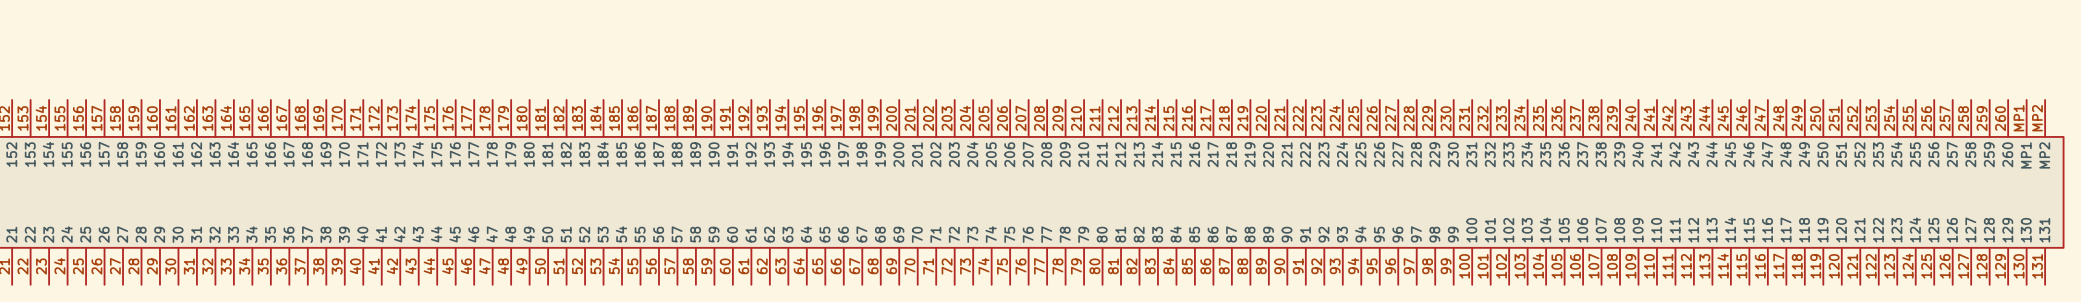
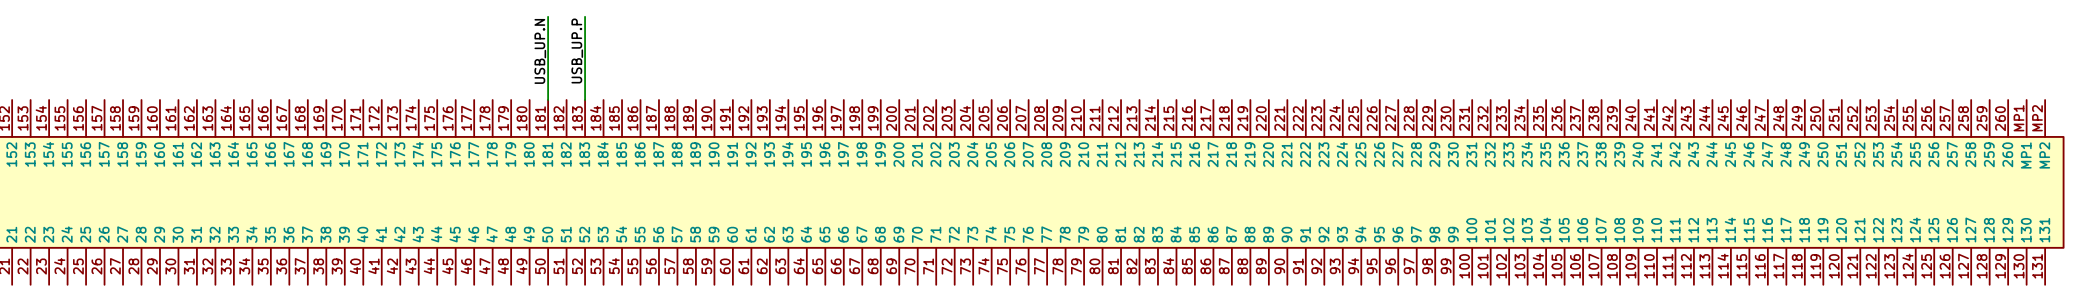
wire: none -> (548, 16) (548, 99)
wire: none -> (585, 16) (585, 99)
label: none -> USB_UP.P (577, 50)
label: none -> USB_UP.N (540, 51)

